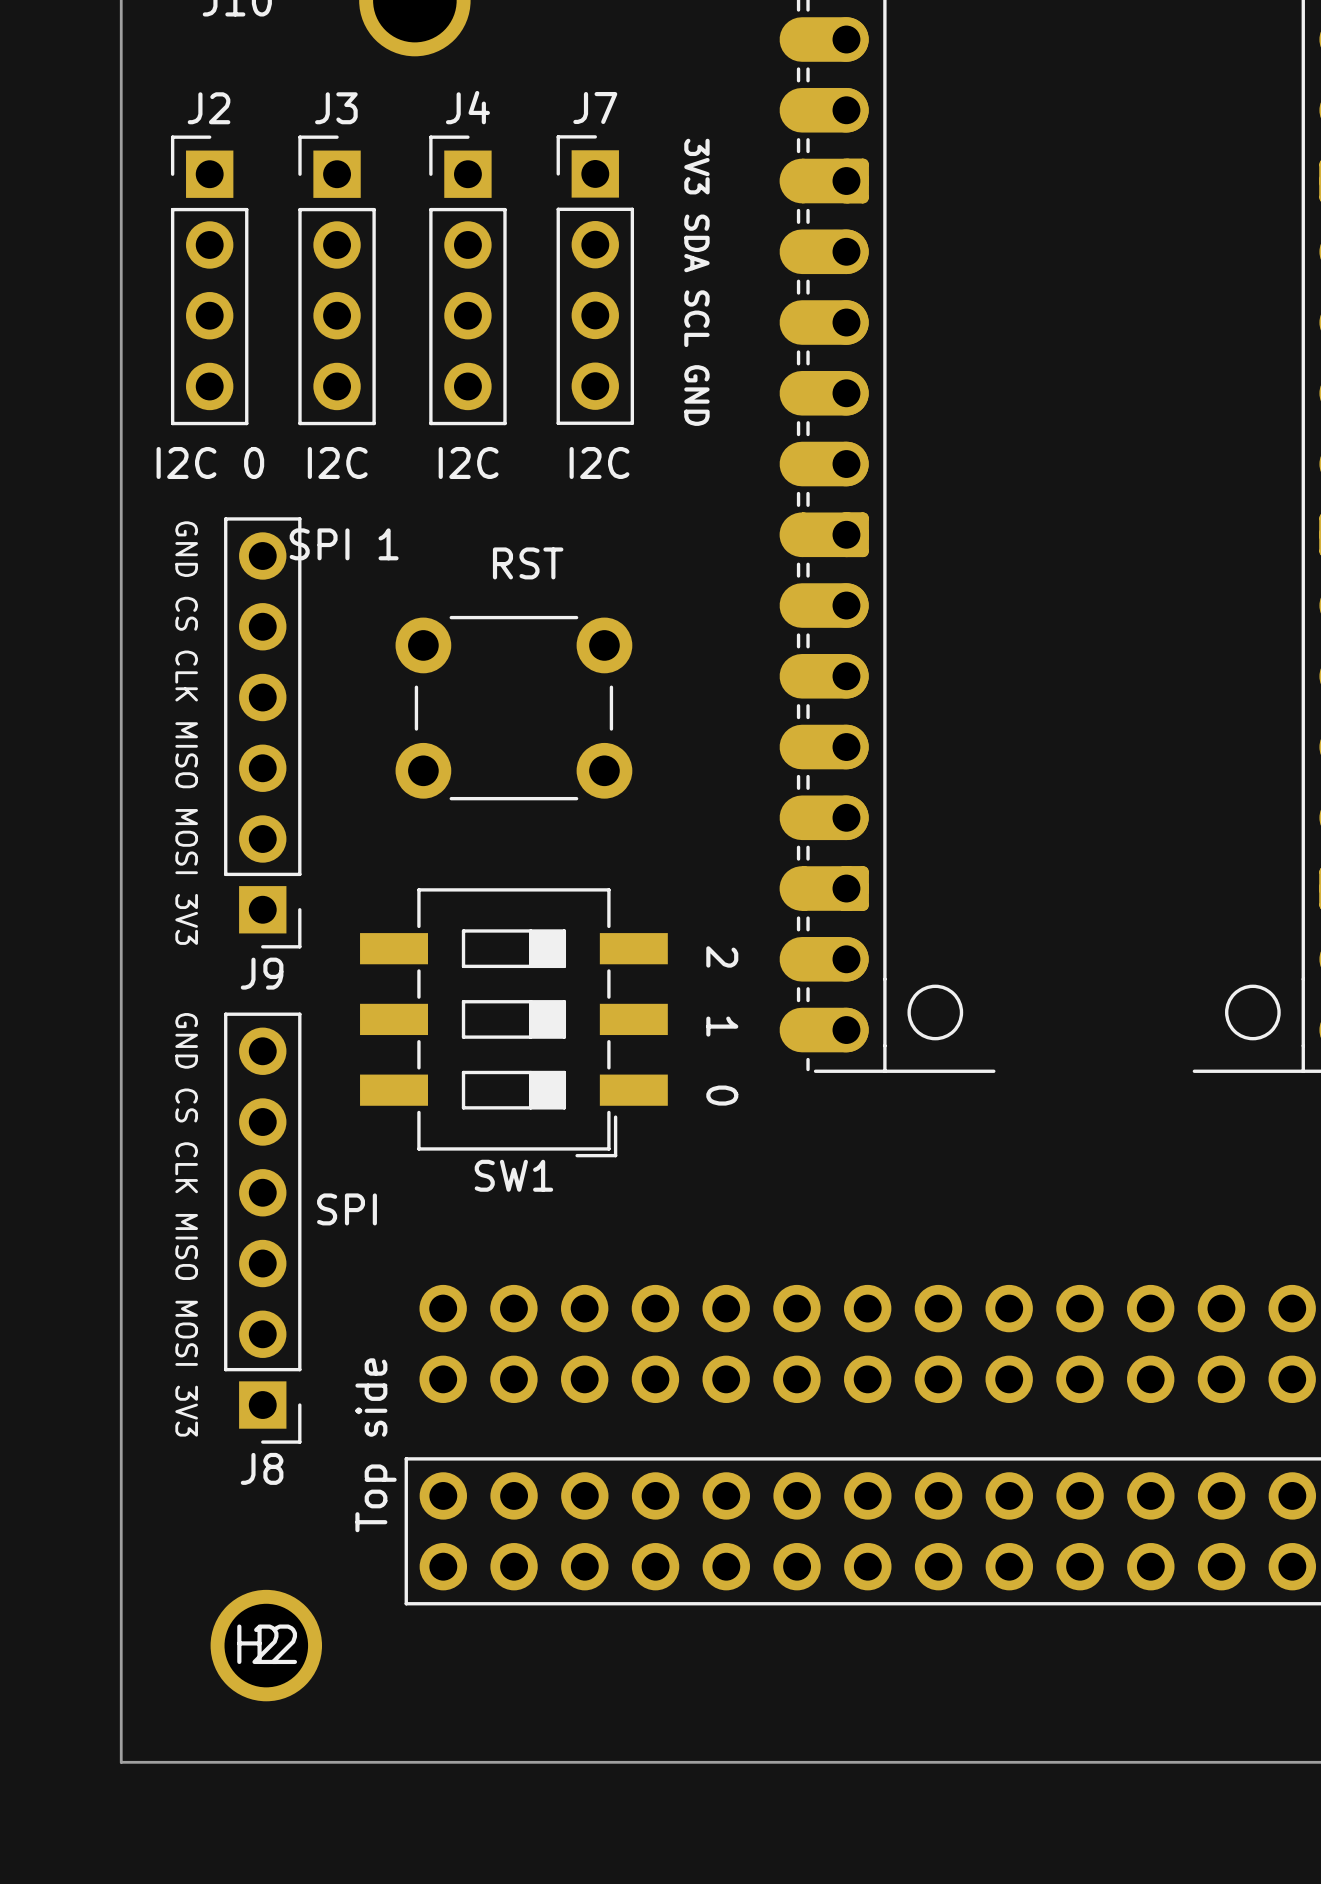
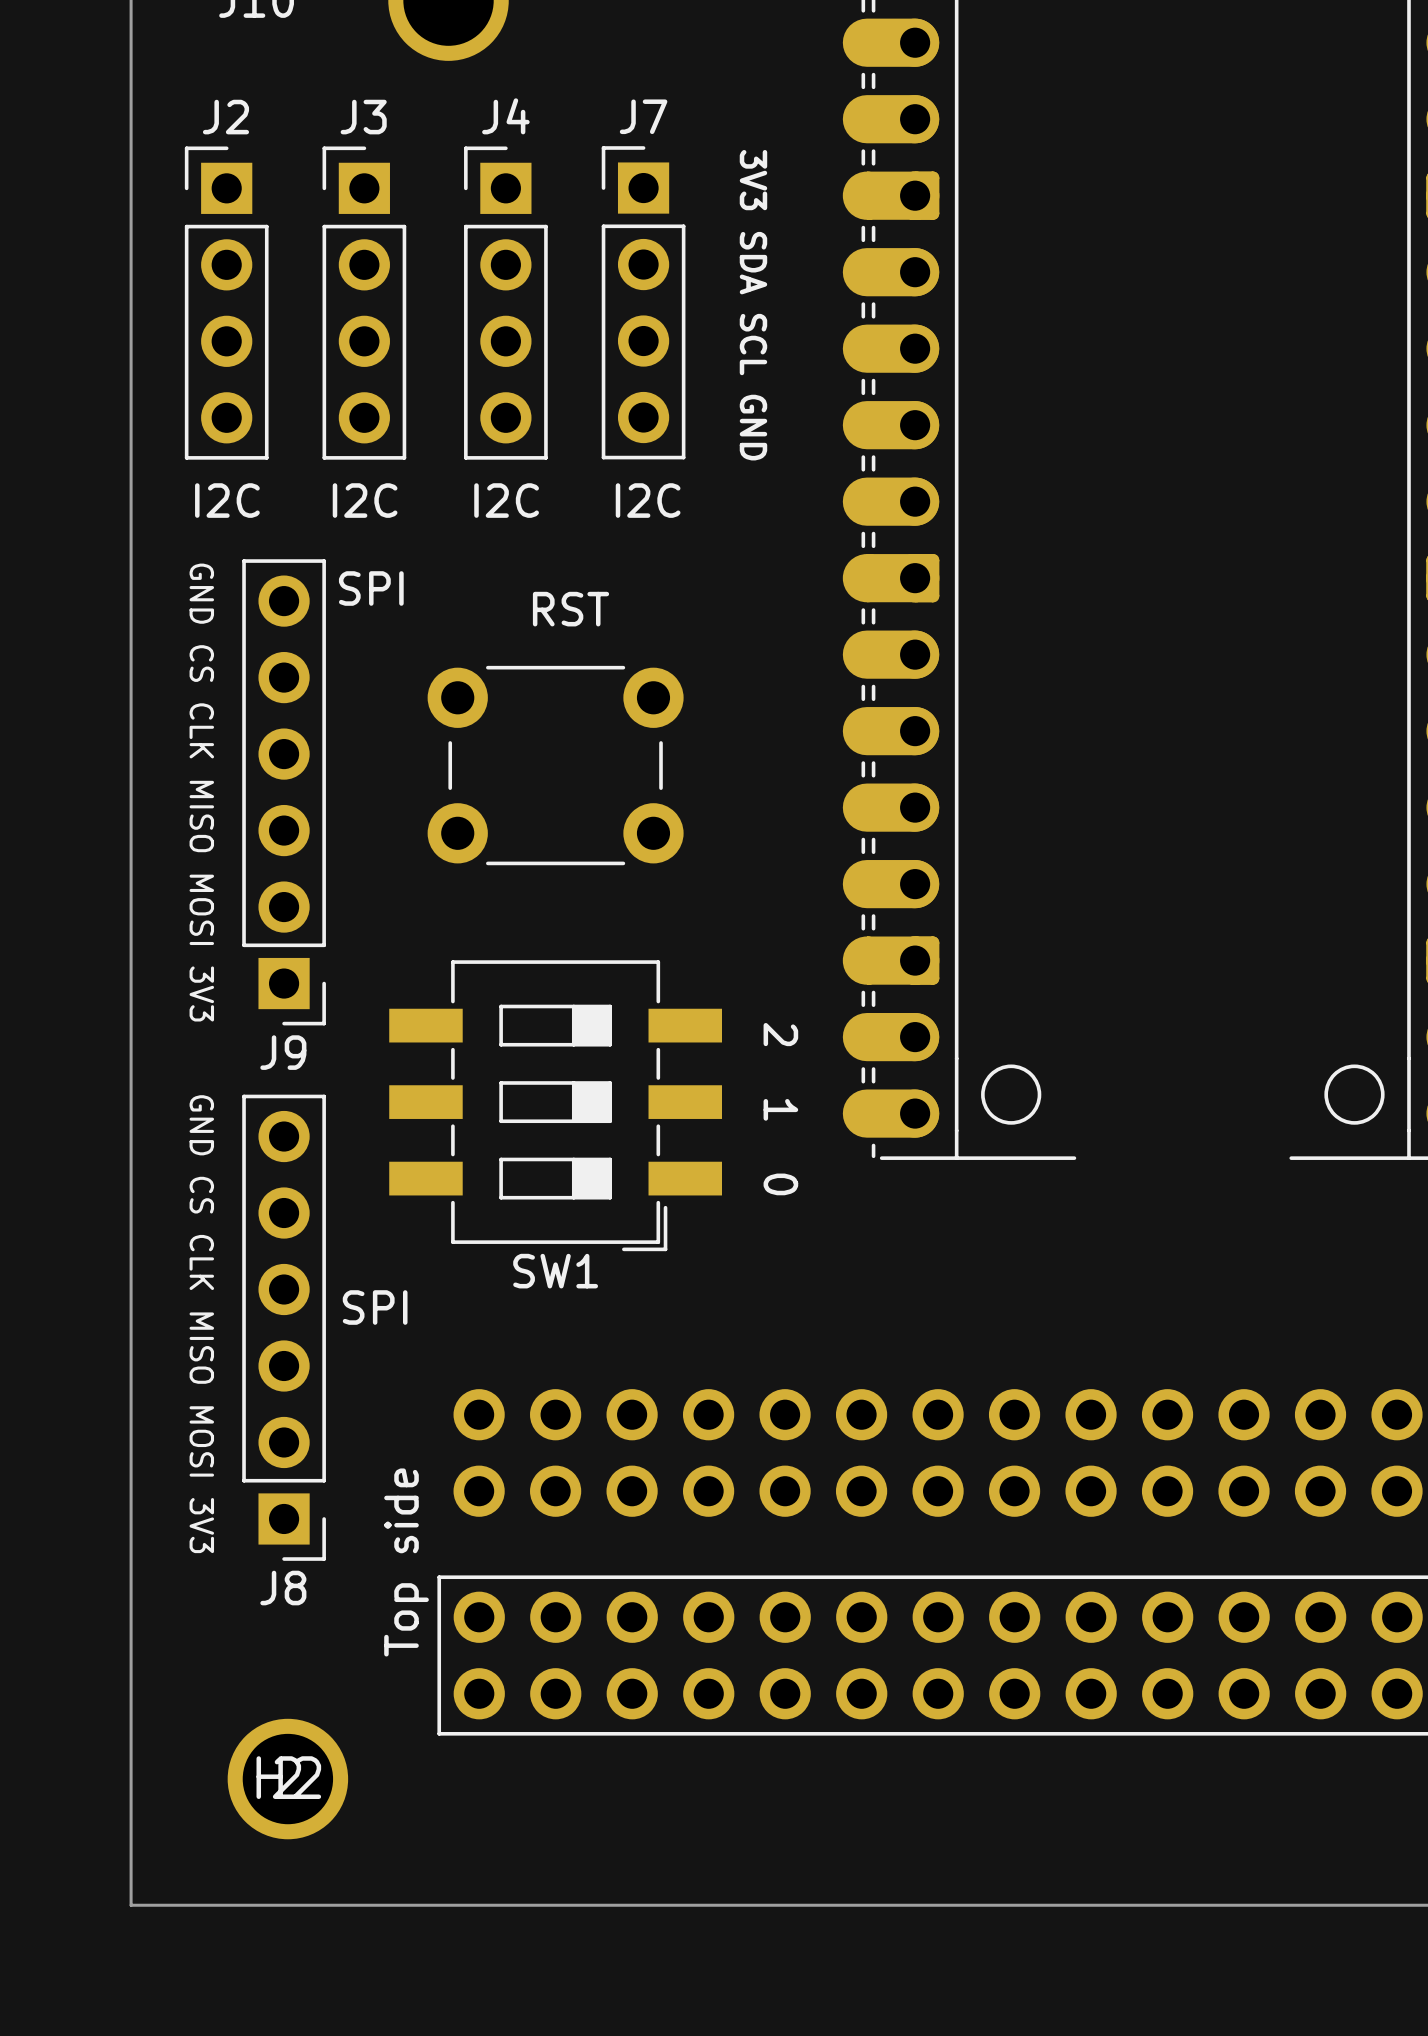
J2 value: I2C 0 (210, 462) -> I2C (227, 500)
J9 value: SPI 1 (344, 544) -> SPI (371, 588)

